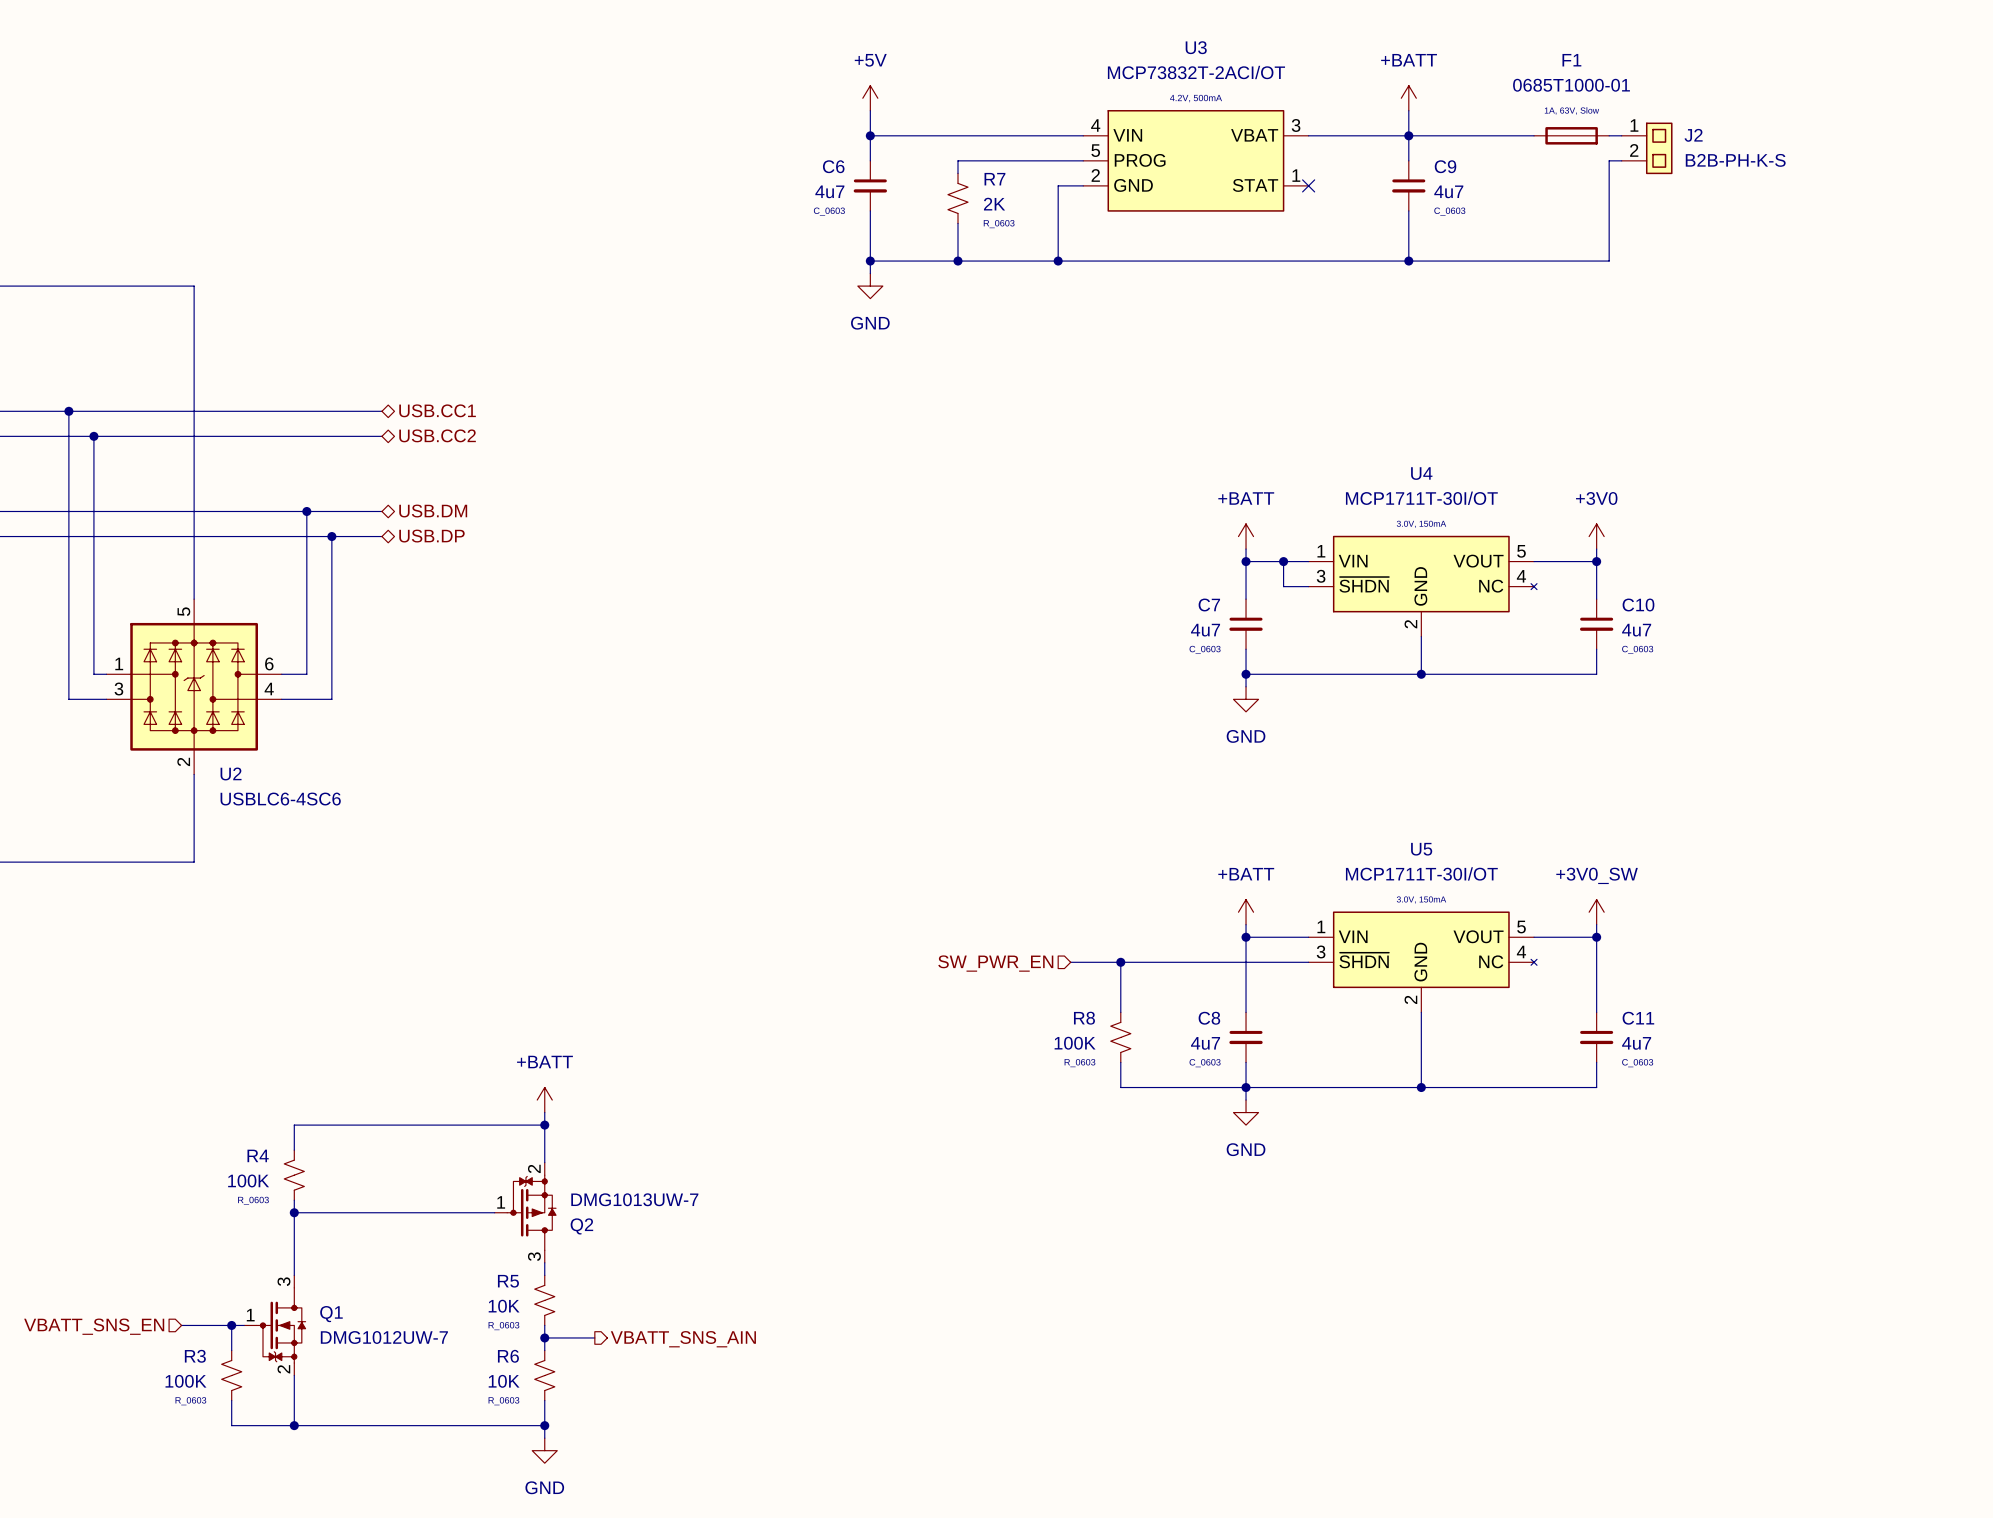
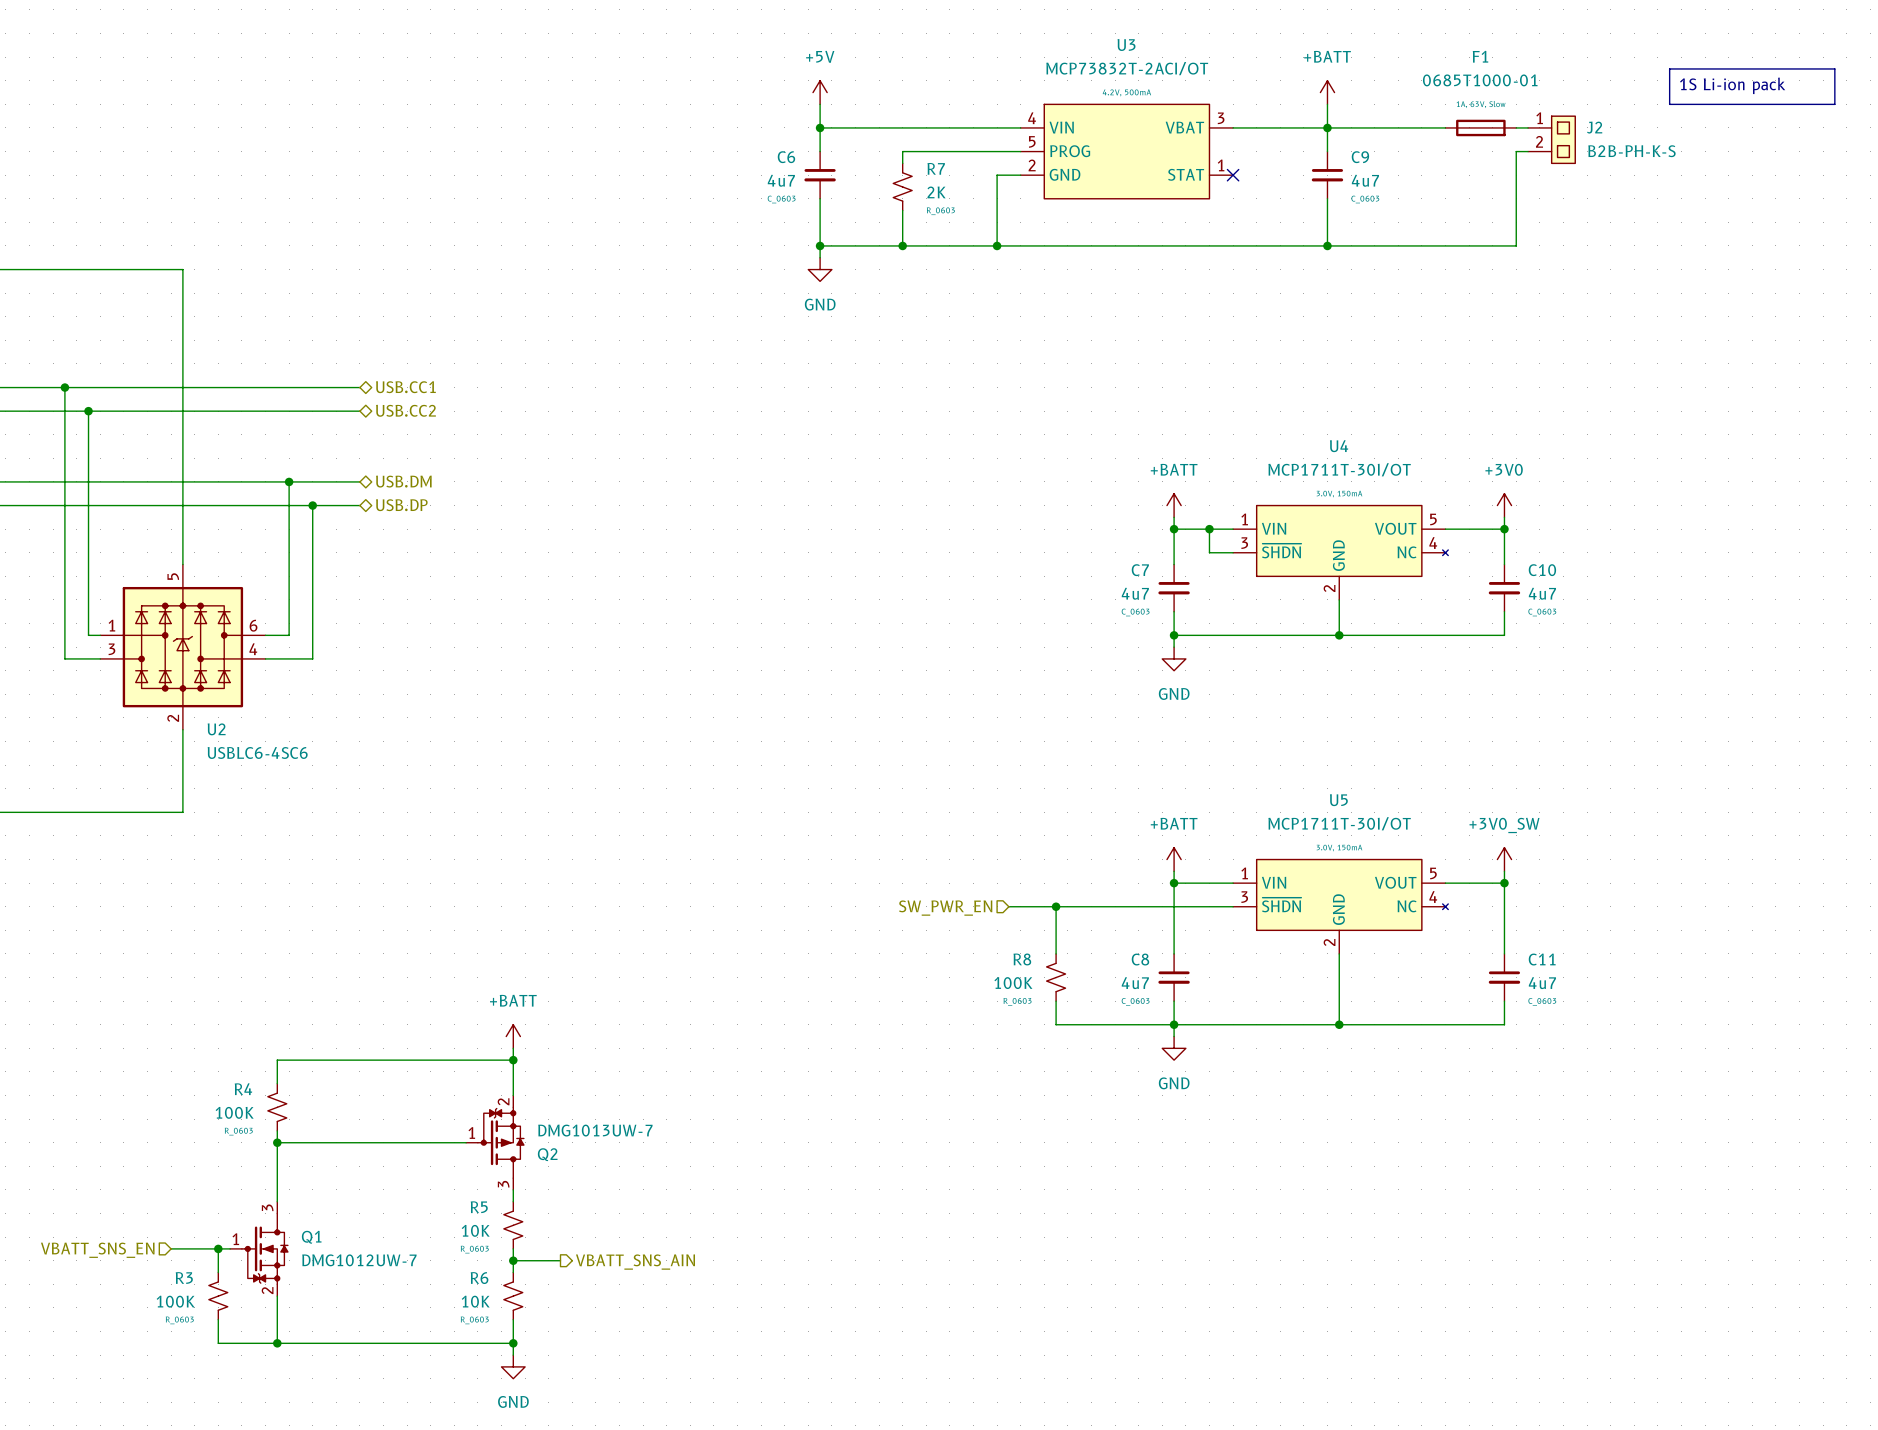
line: none -> (1669, 68) (1834, 68) (1834, 104) (1669, 104) (1669, 68)
text: none -> 1S Li-ion pack (1732, 85)

